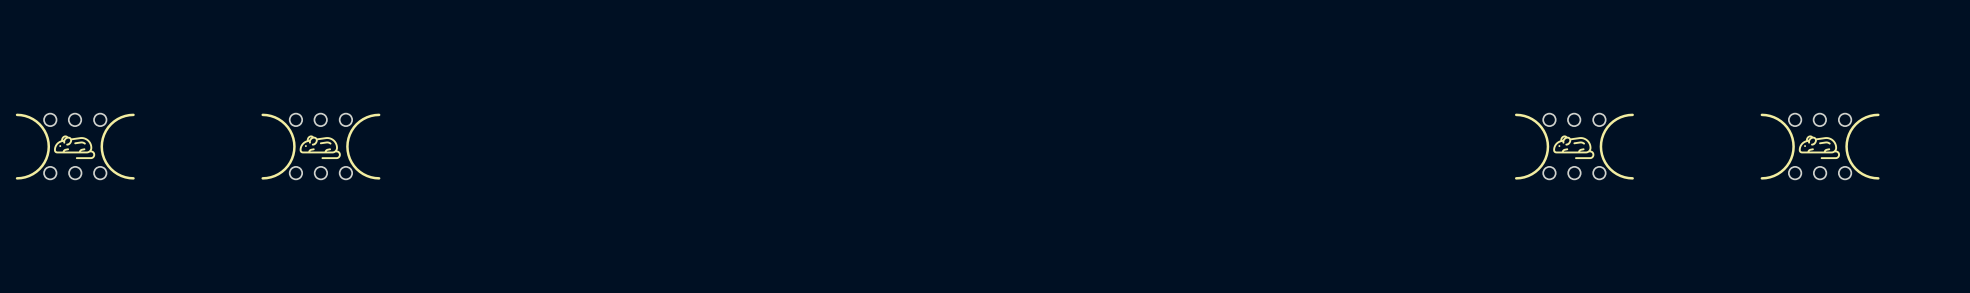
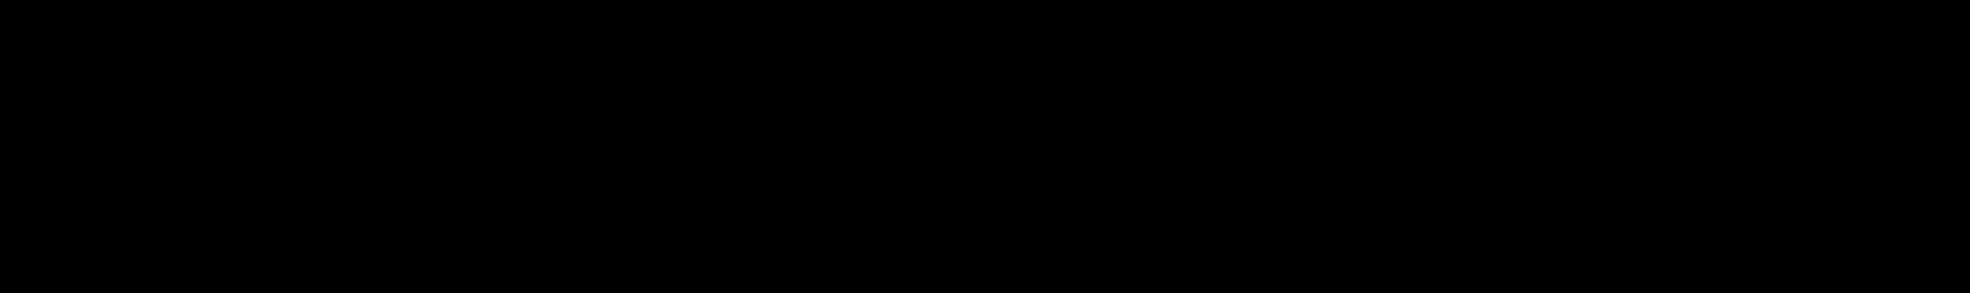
part: (75, 146) -> none
part: (320, 146) -> none
part: (1574, 146) -> none
part: (1820, 146) -> none

